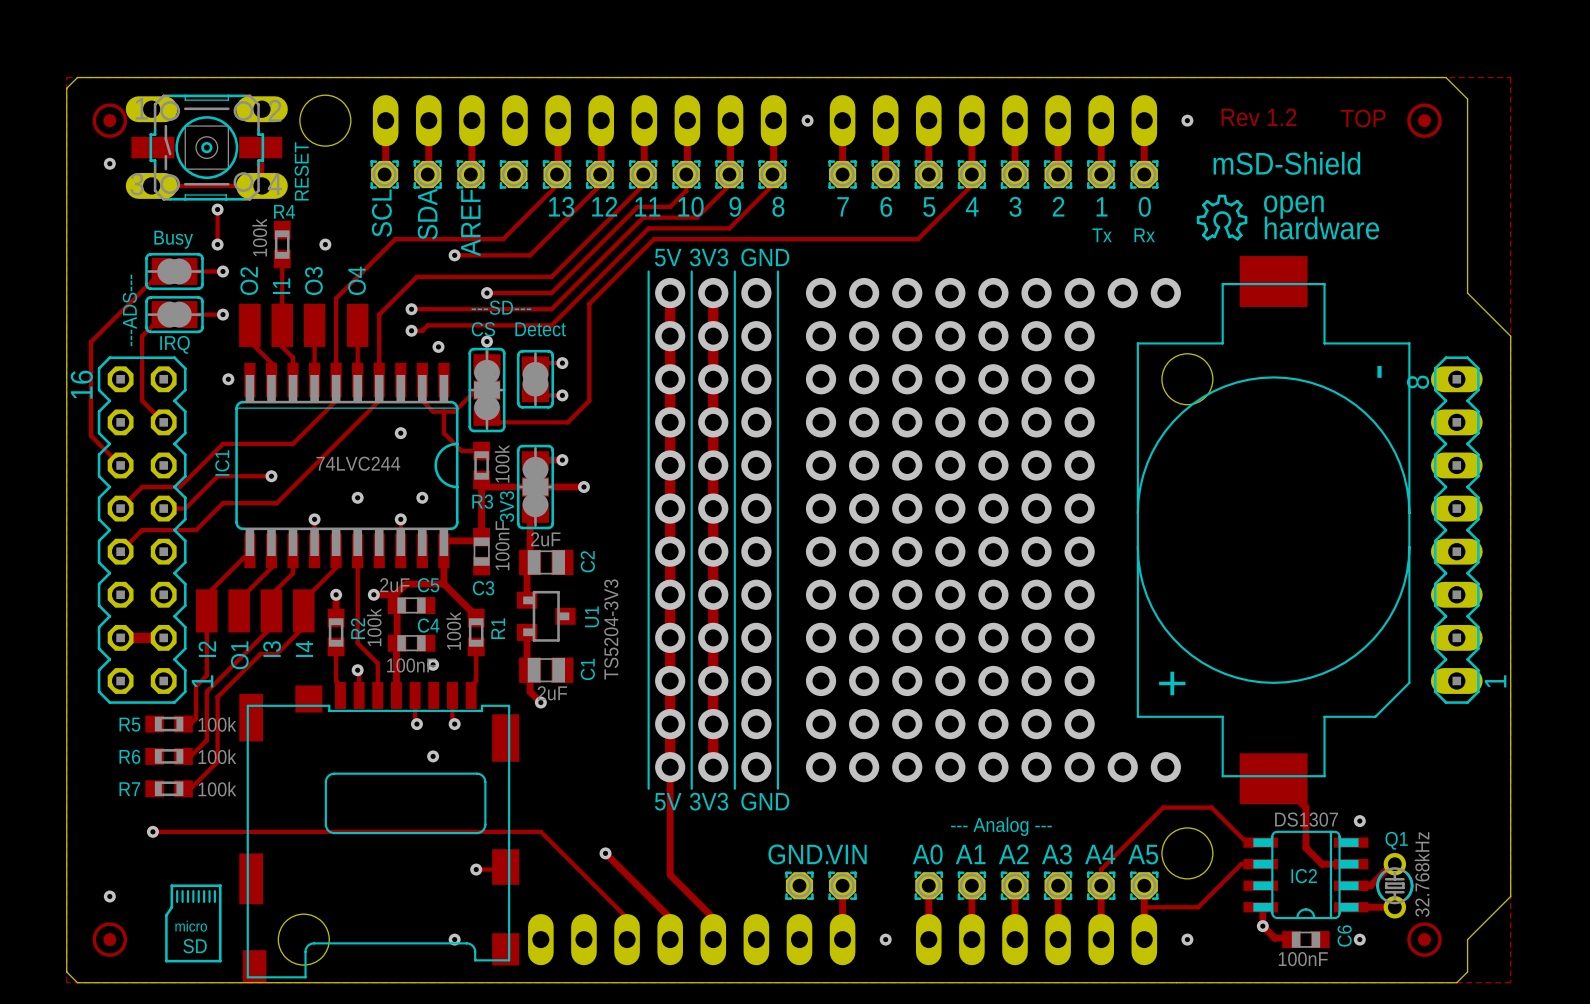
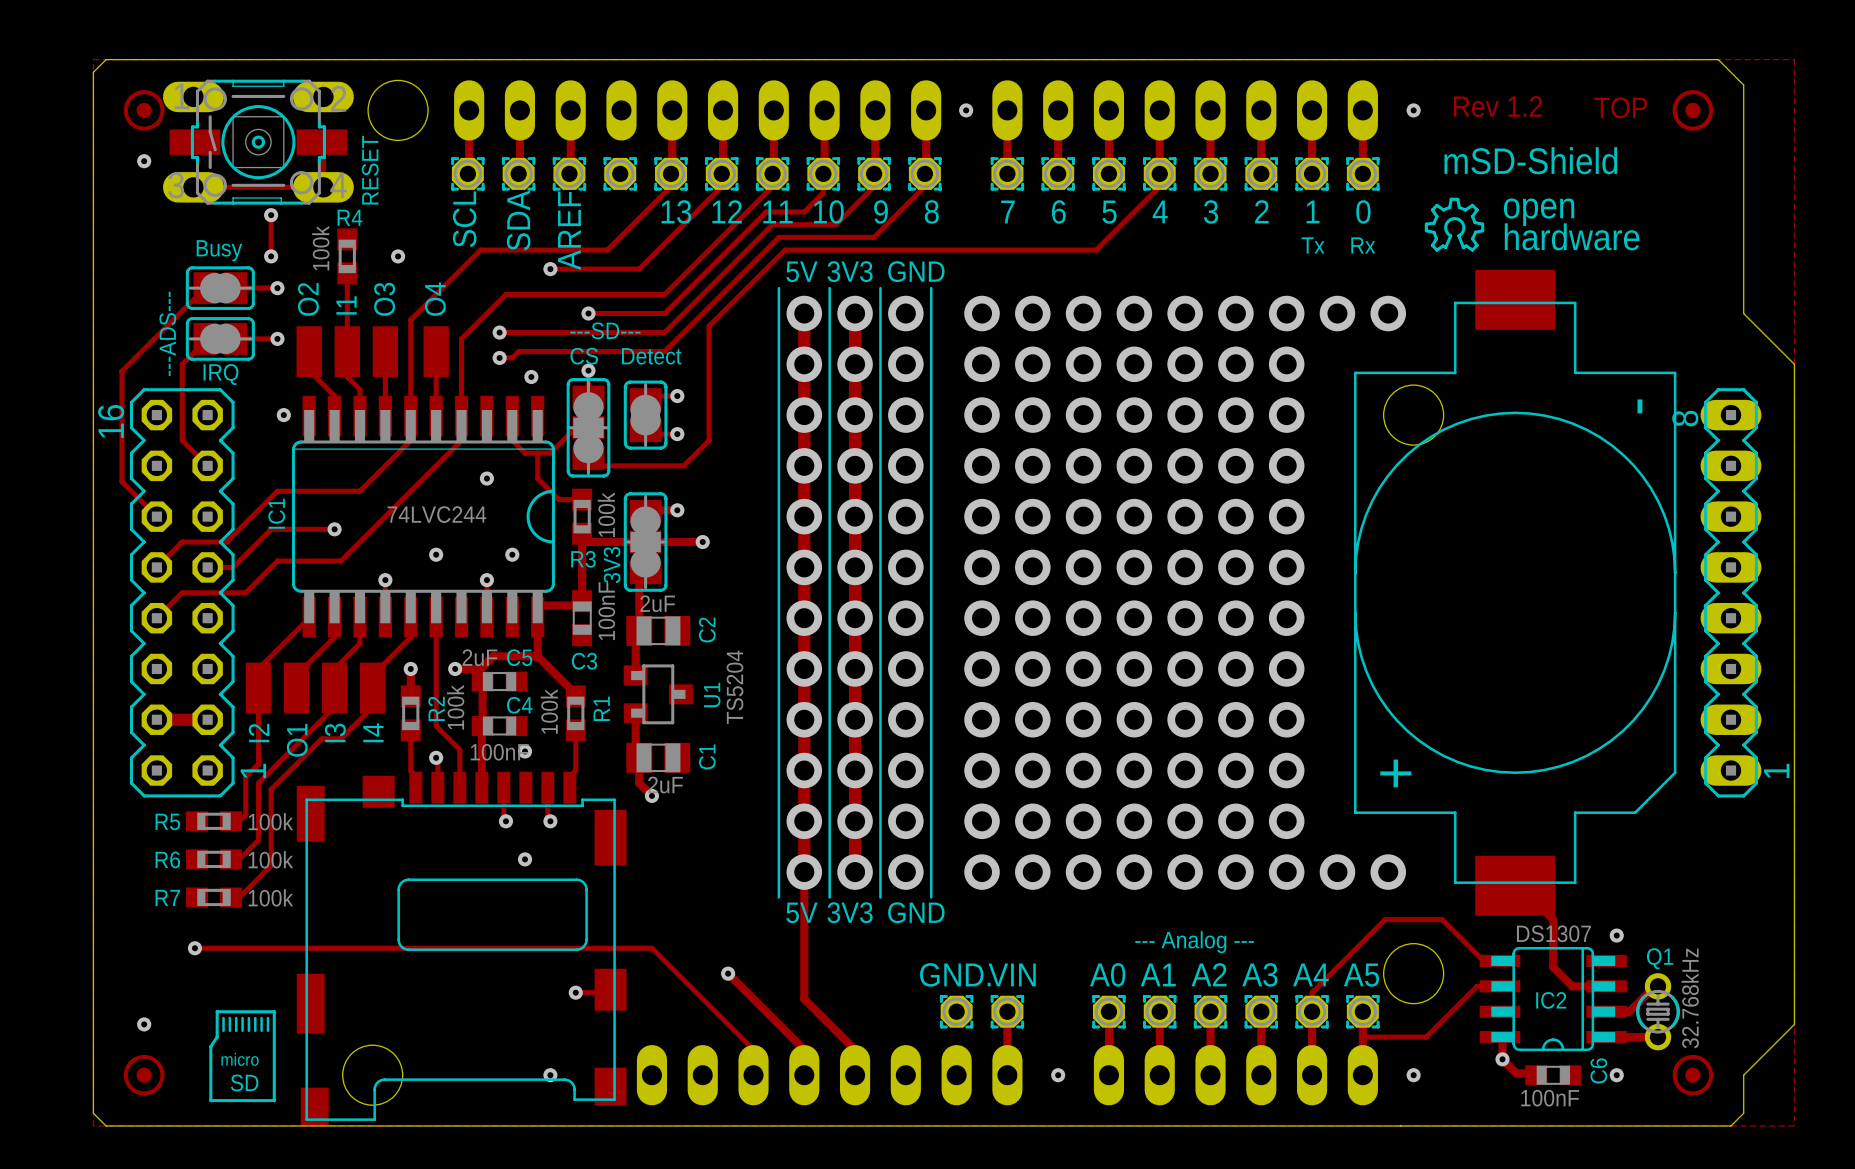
U1 value: TS5204-3V3 (611, 629) -> TS5204 (734, 687)

